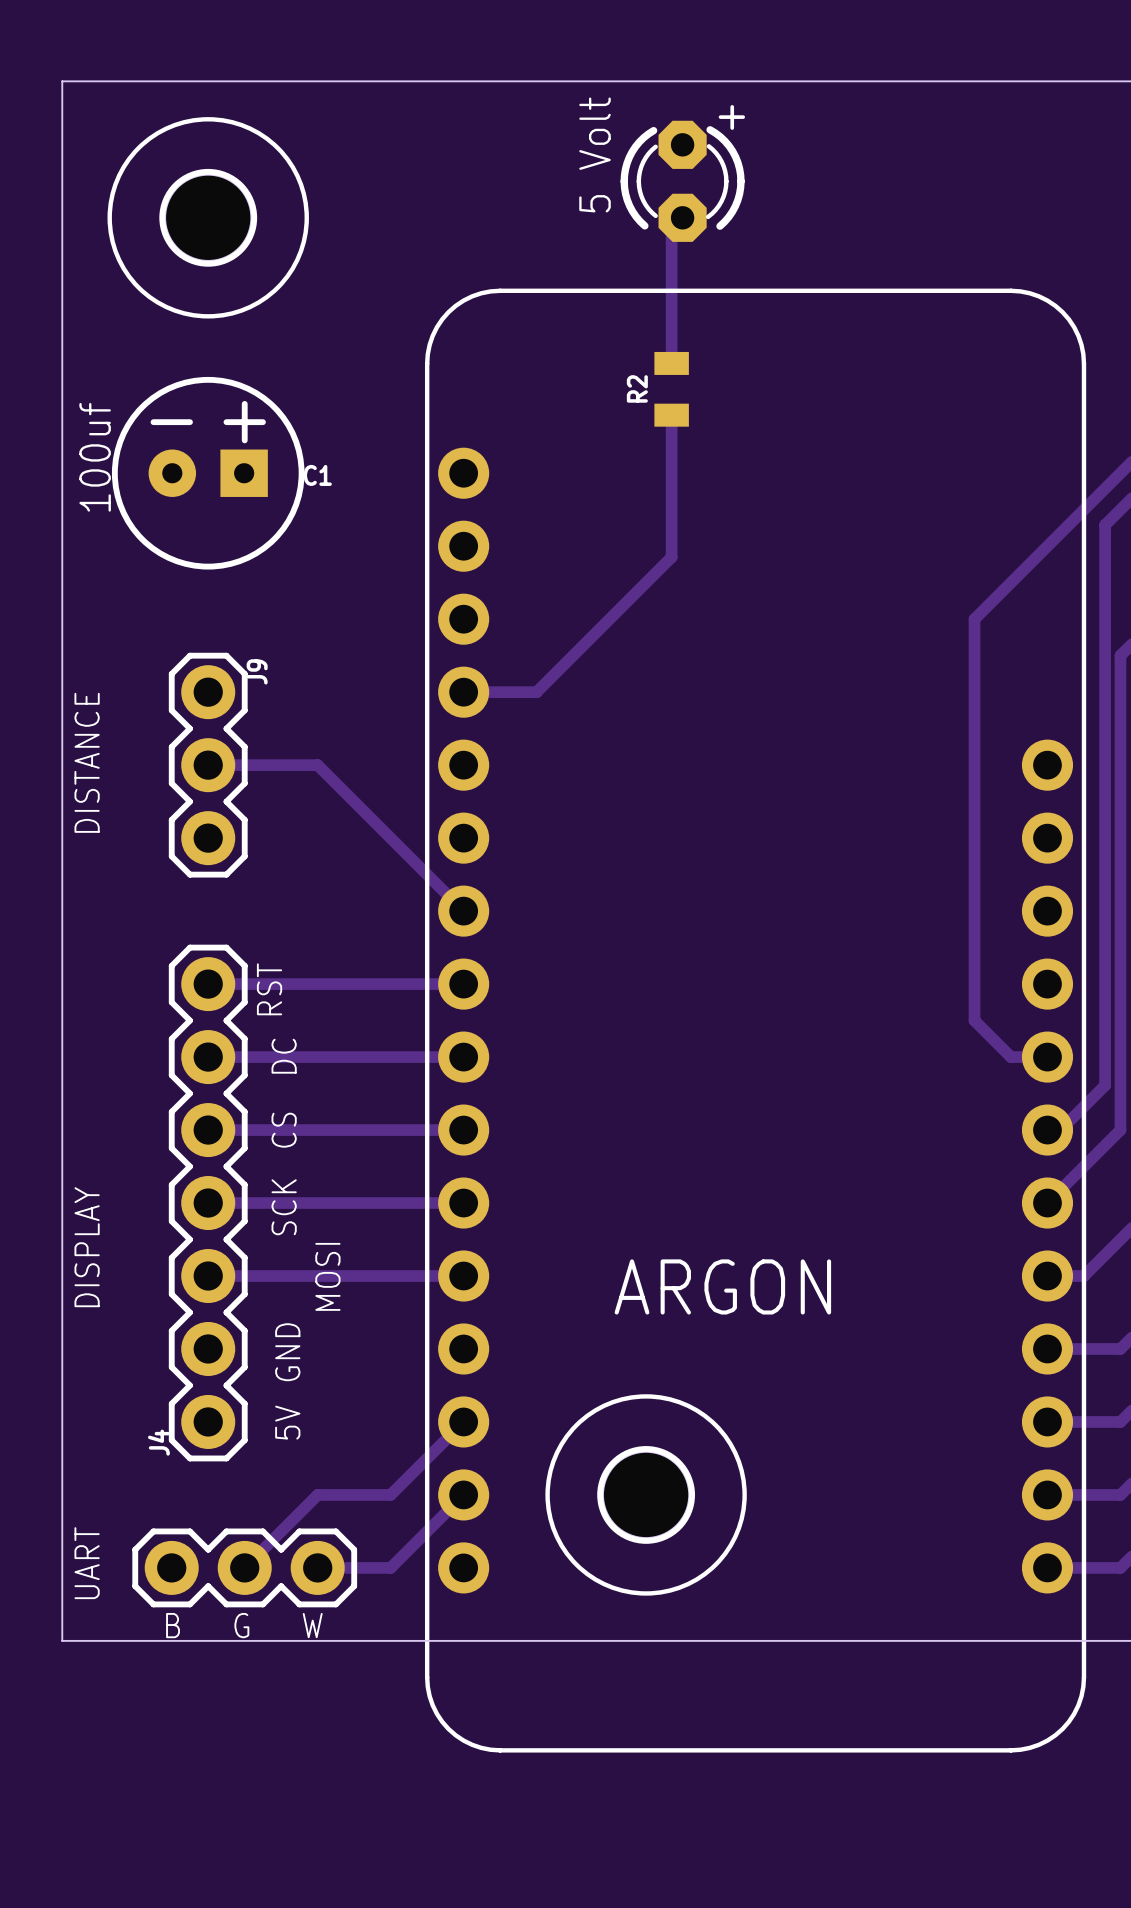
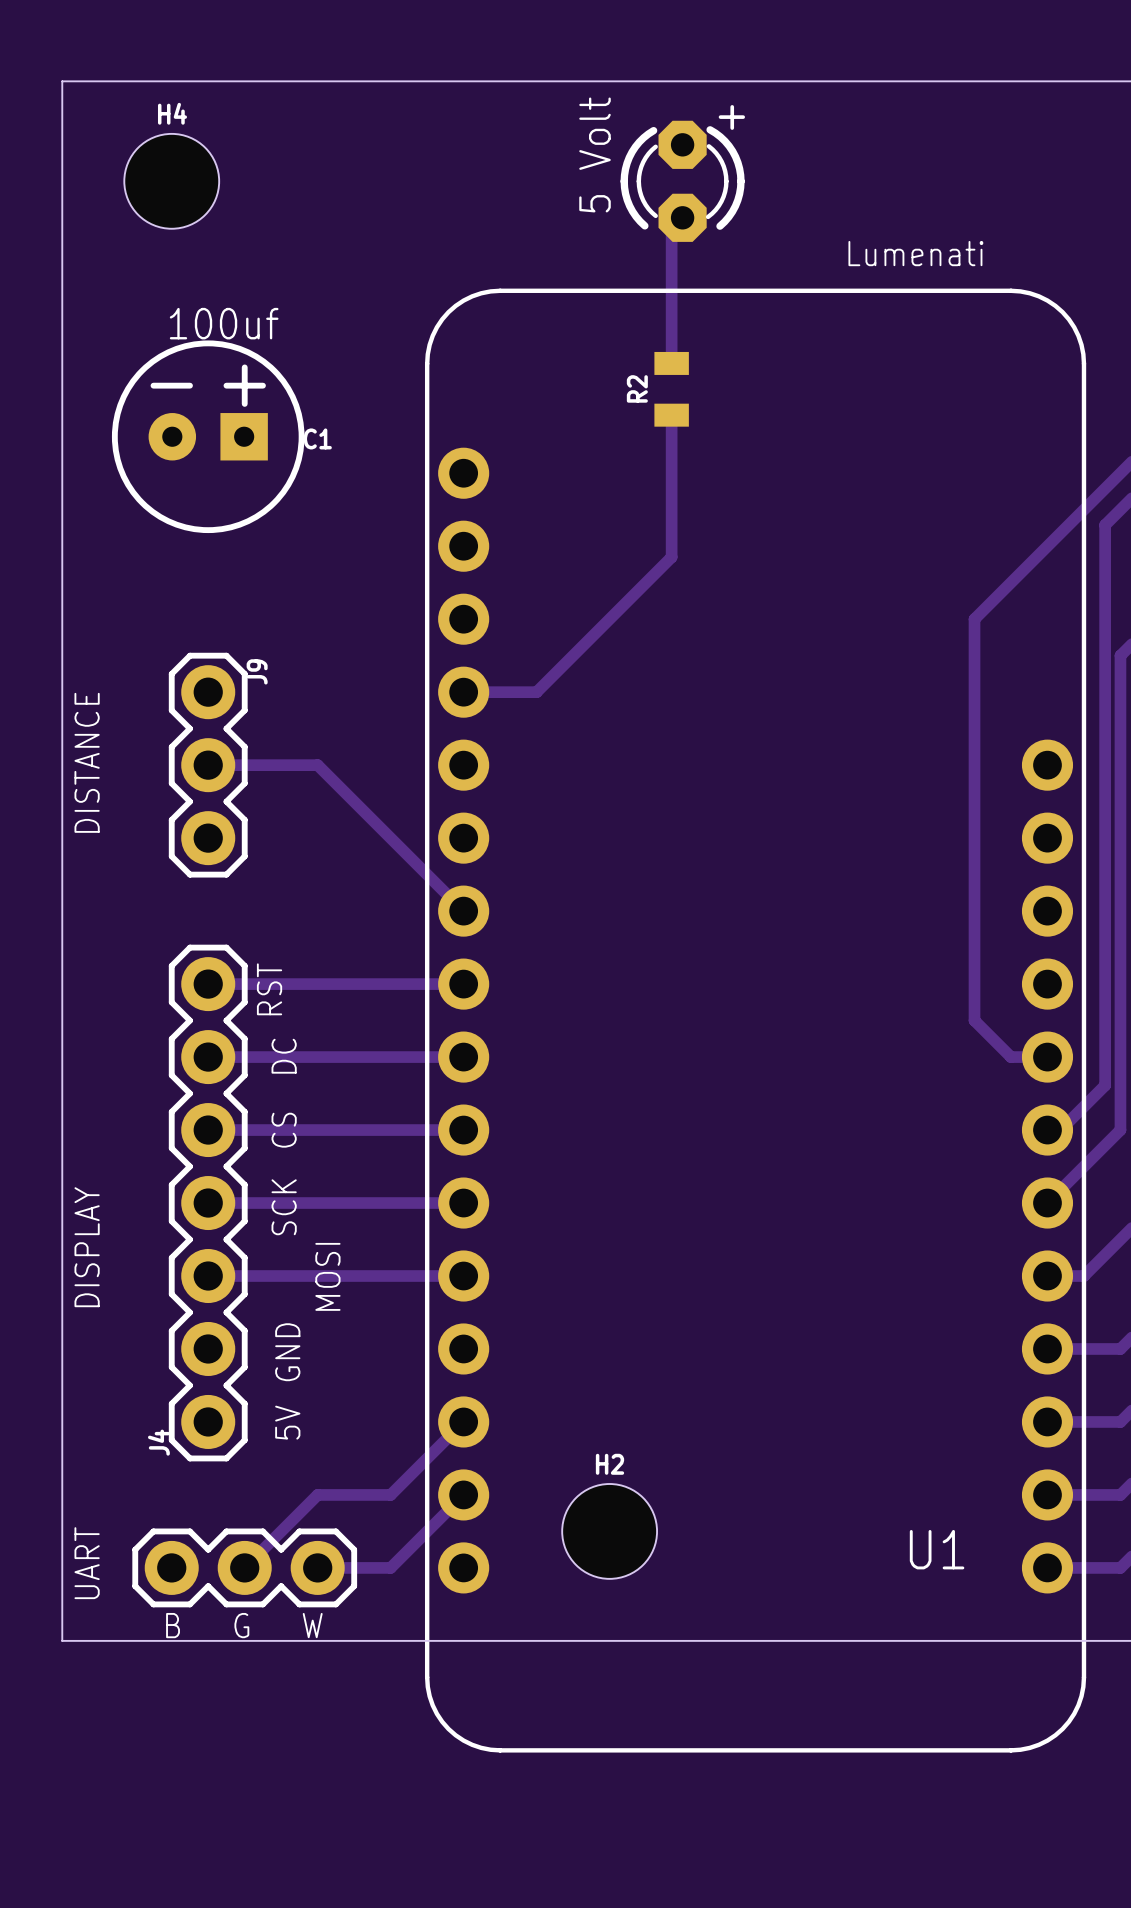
H4: none -> (171, 181)
part: (208, 217) -> none
text: none -> Lumenati (915, 253)
text rotation: 0° (95, 457) -> 90° clockwise (224, 323)
text position: 100uf (95, 457) -> 100uf (224, 323)
C1 position: (208, 473) -> (208, 436)
text: ARGON (722, 1286) -> none
part: (646, 1494) -> none
H2: none -> (609, 1531)
U1 name: none -> U1 (937, 1549)

